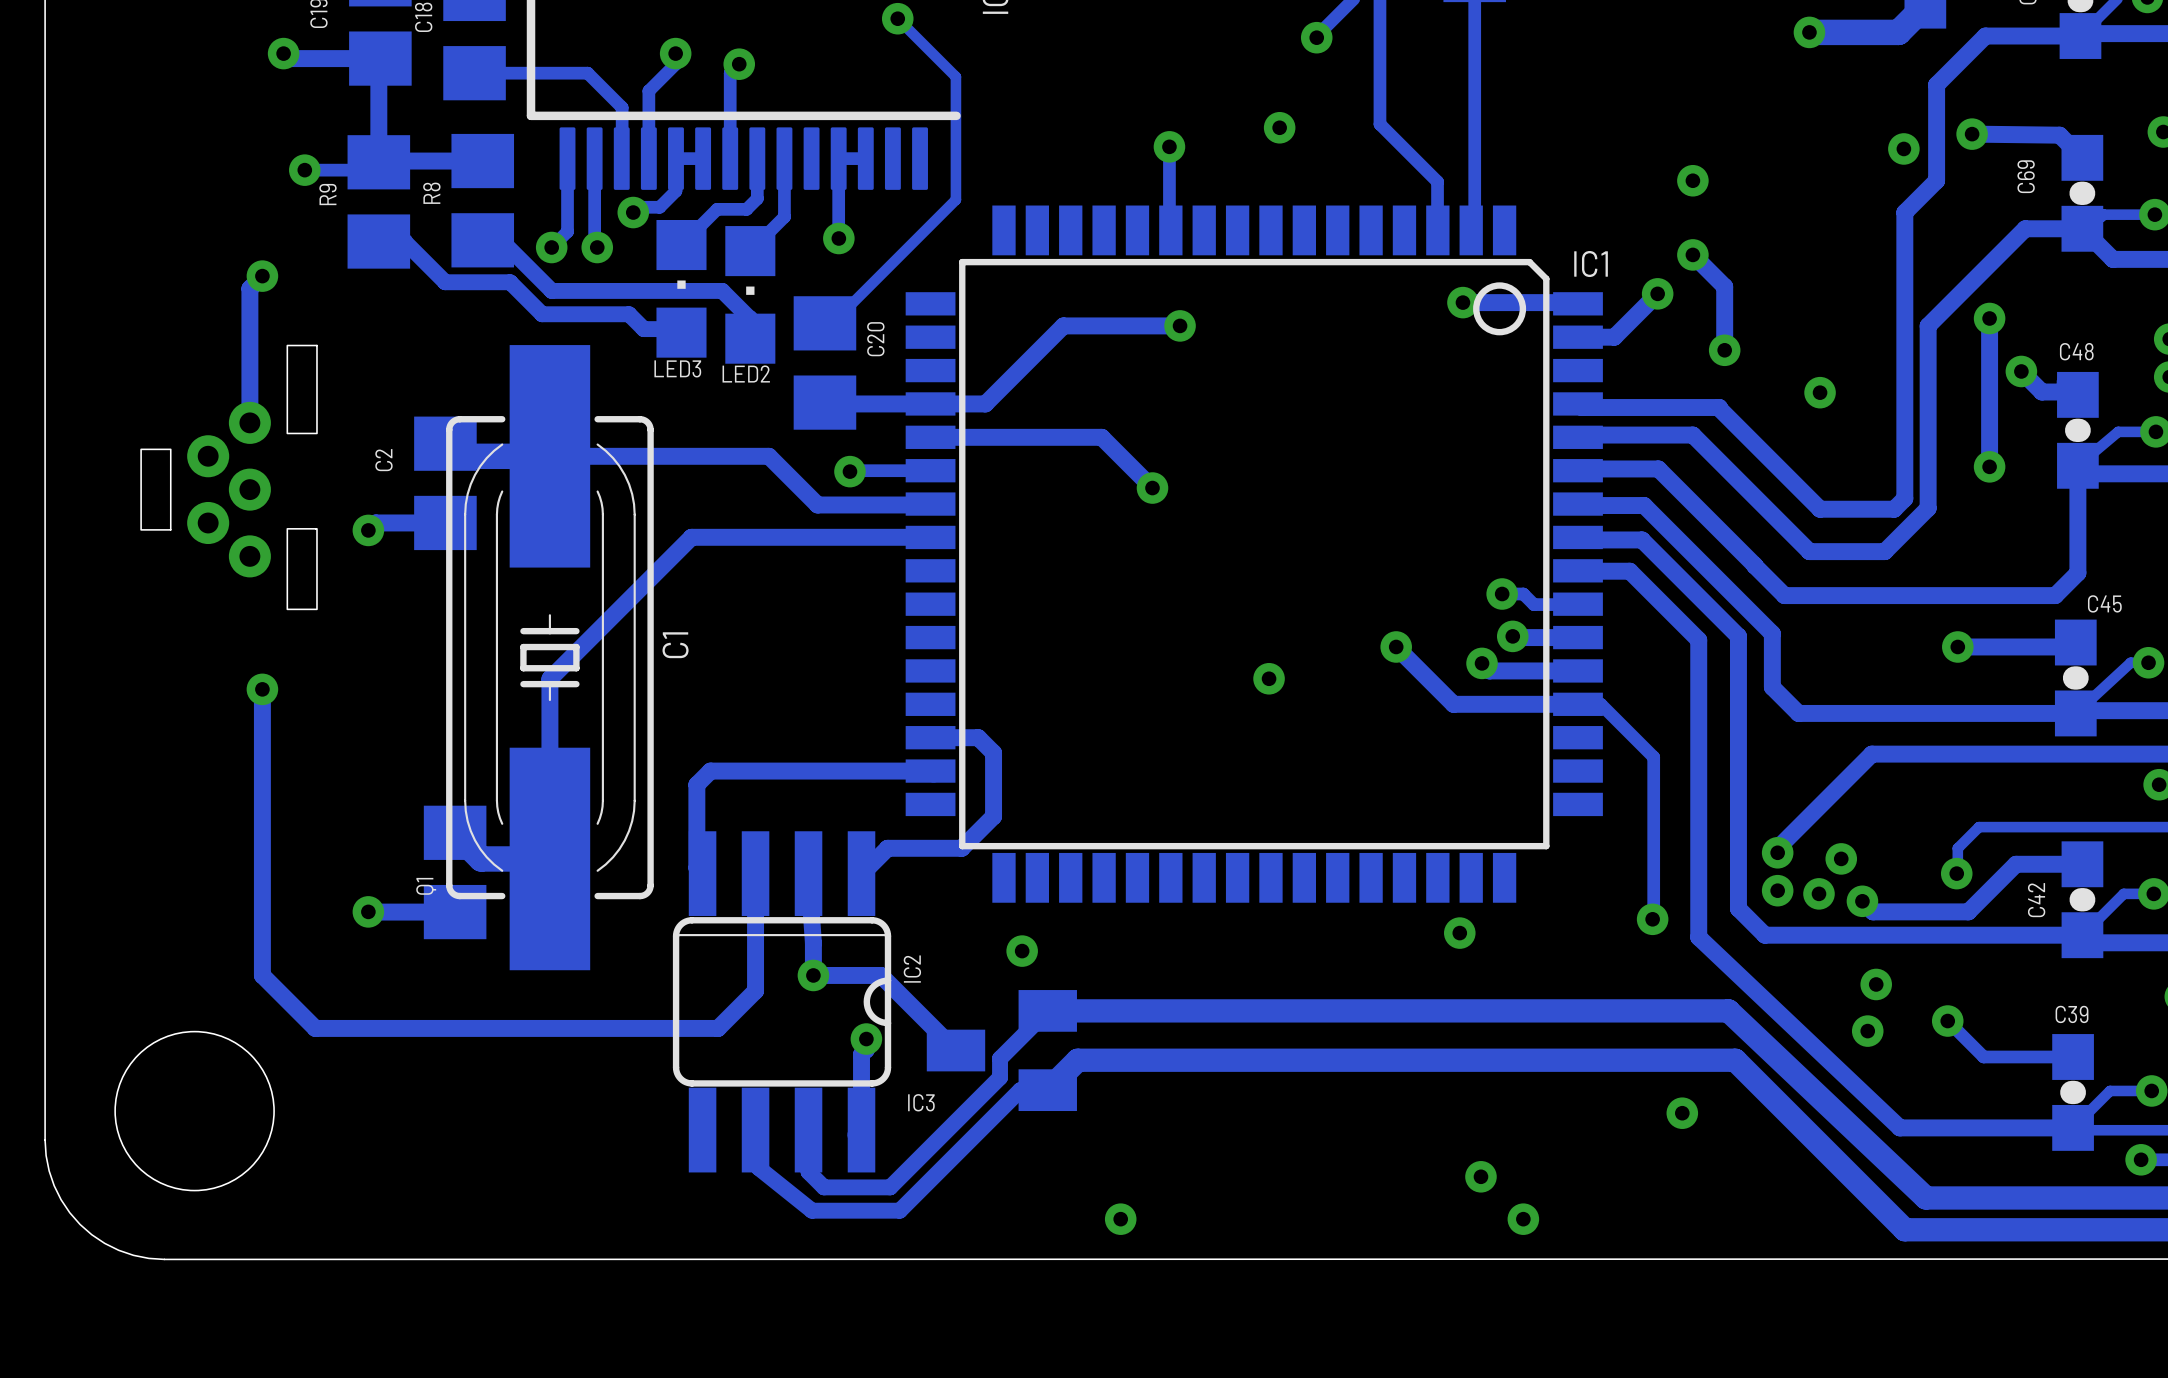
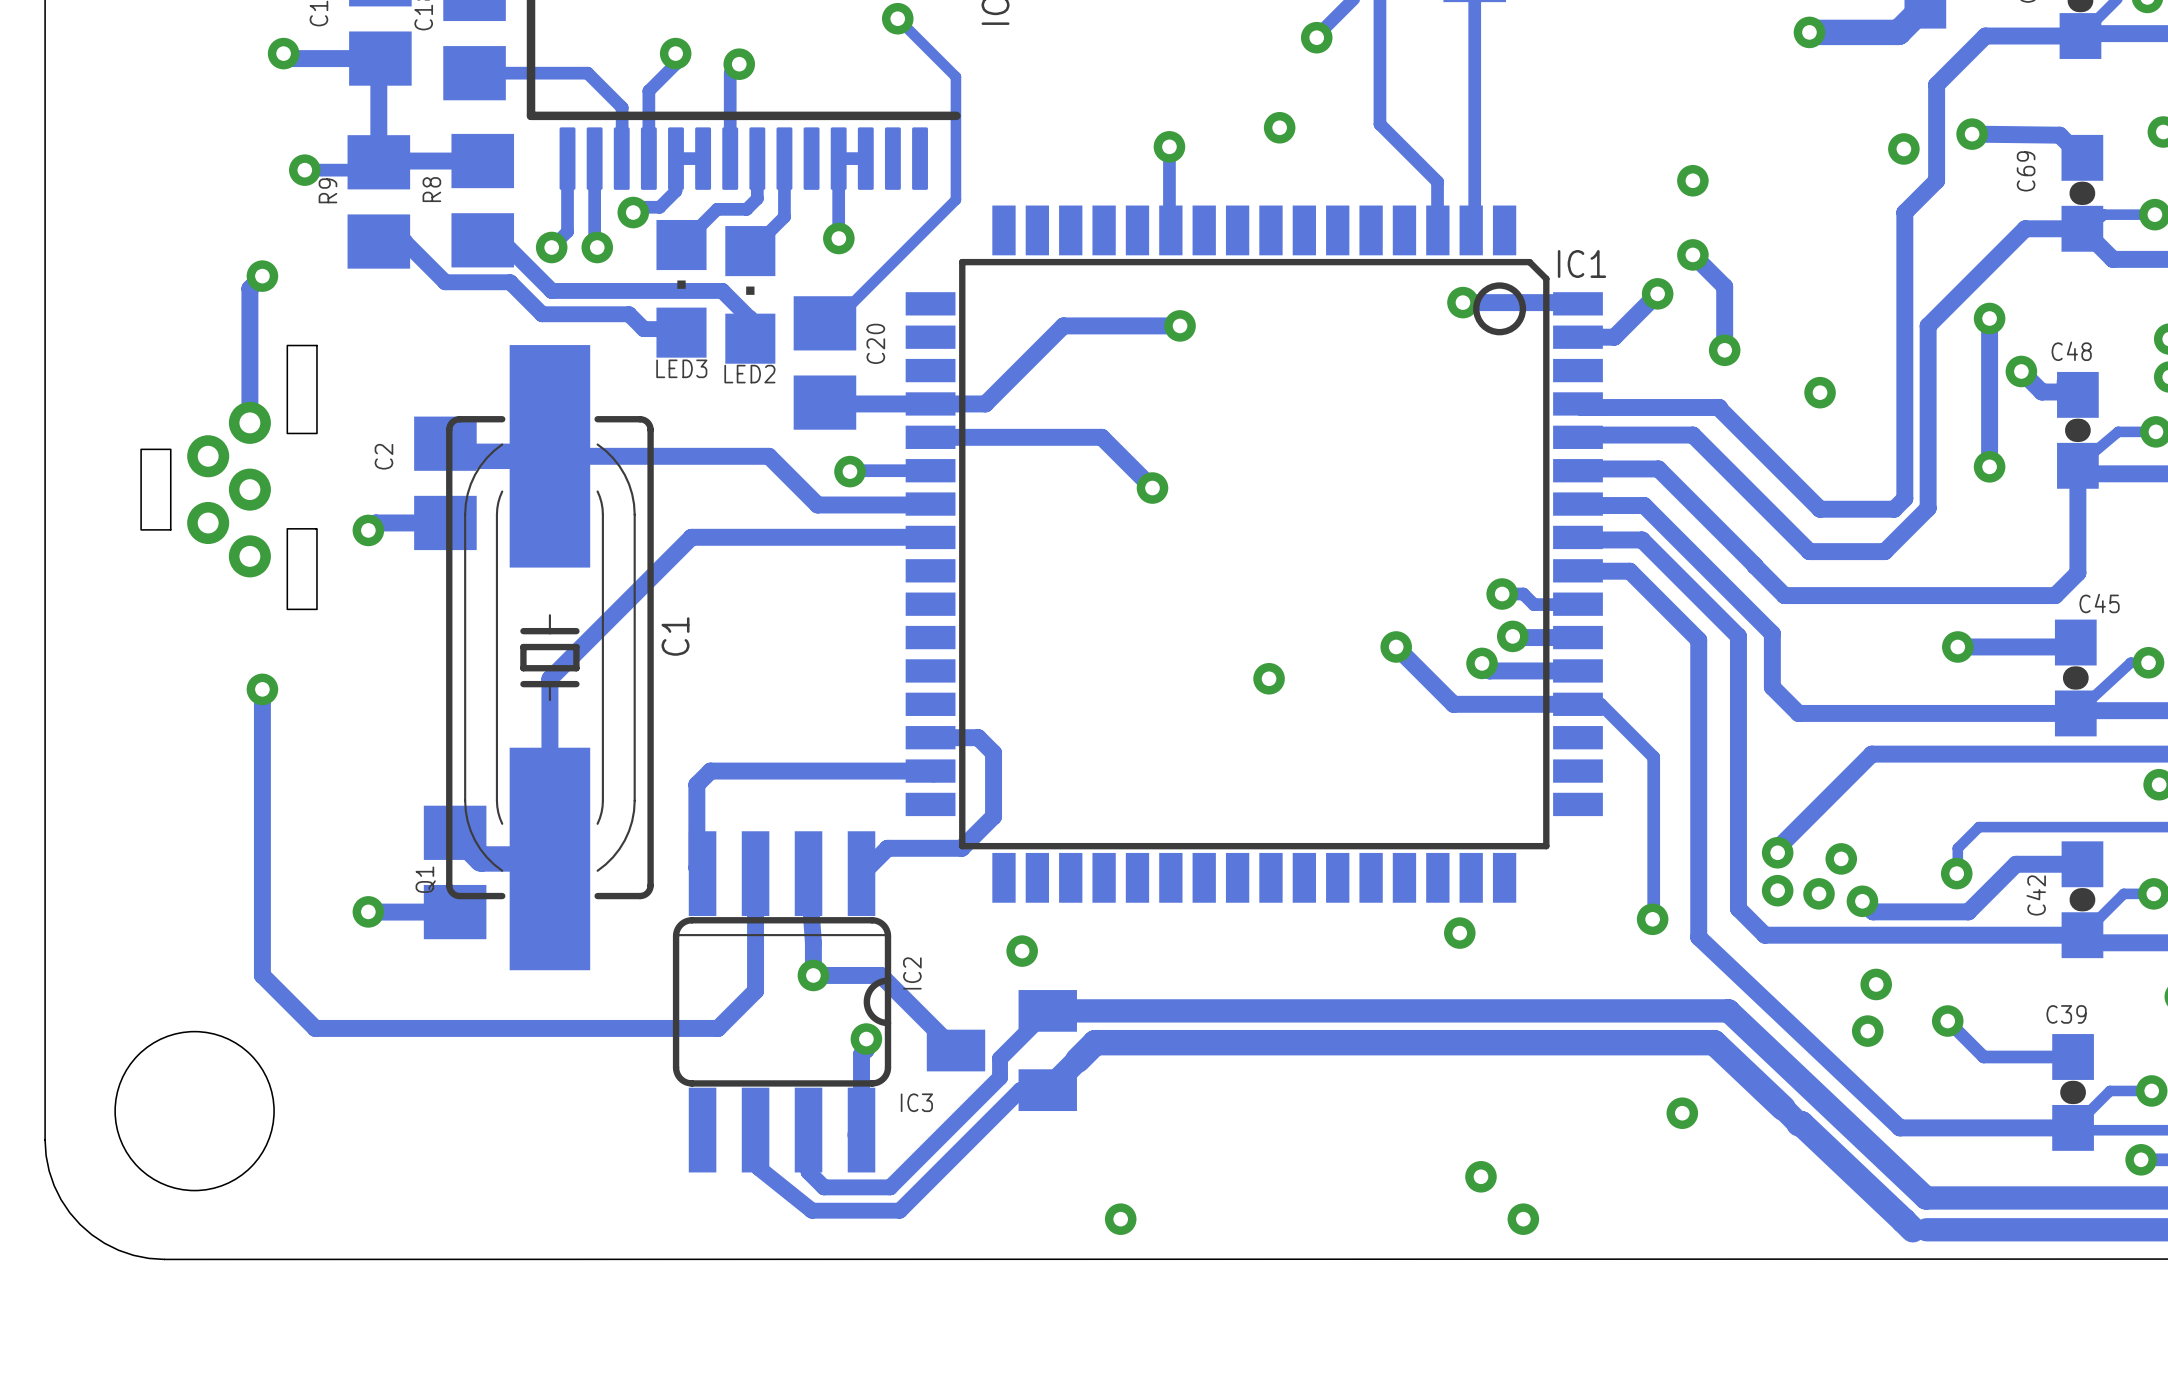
track: (1077, 1060) (1735, 1060) (1783, 1108) -> (1077, 1060) (1095, 1042) (1714, 1042) (1783, 1108)
track: (1798, 1123) (1904, 1229) (1926, 1229) -> (1798, 1123) (1801, 1123) (1912, 1229)

